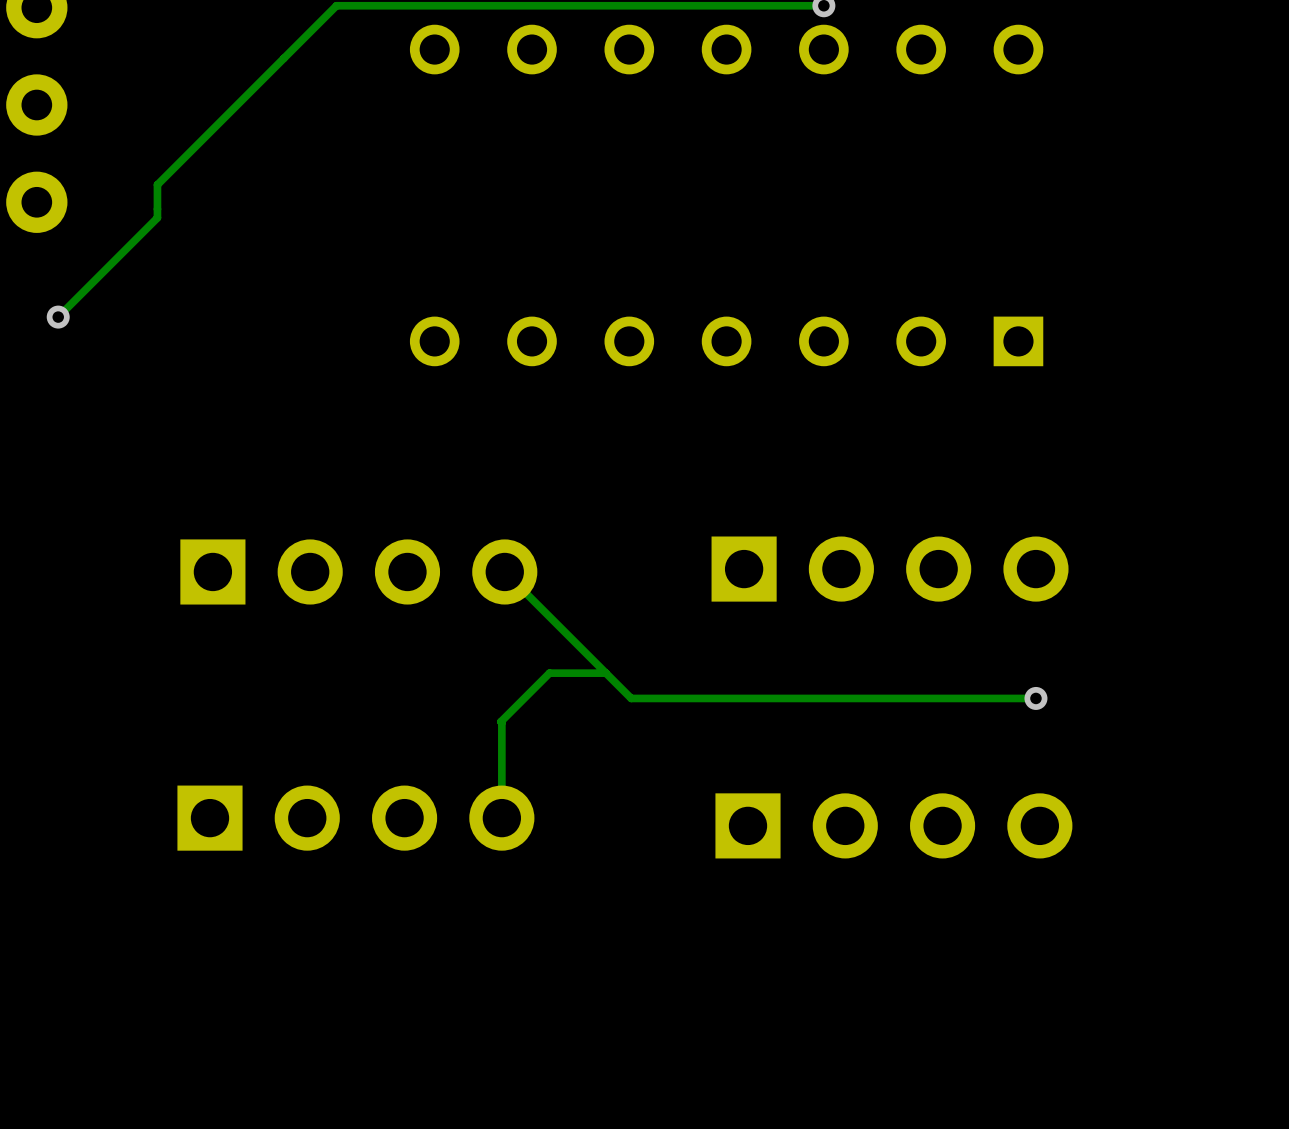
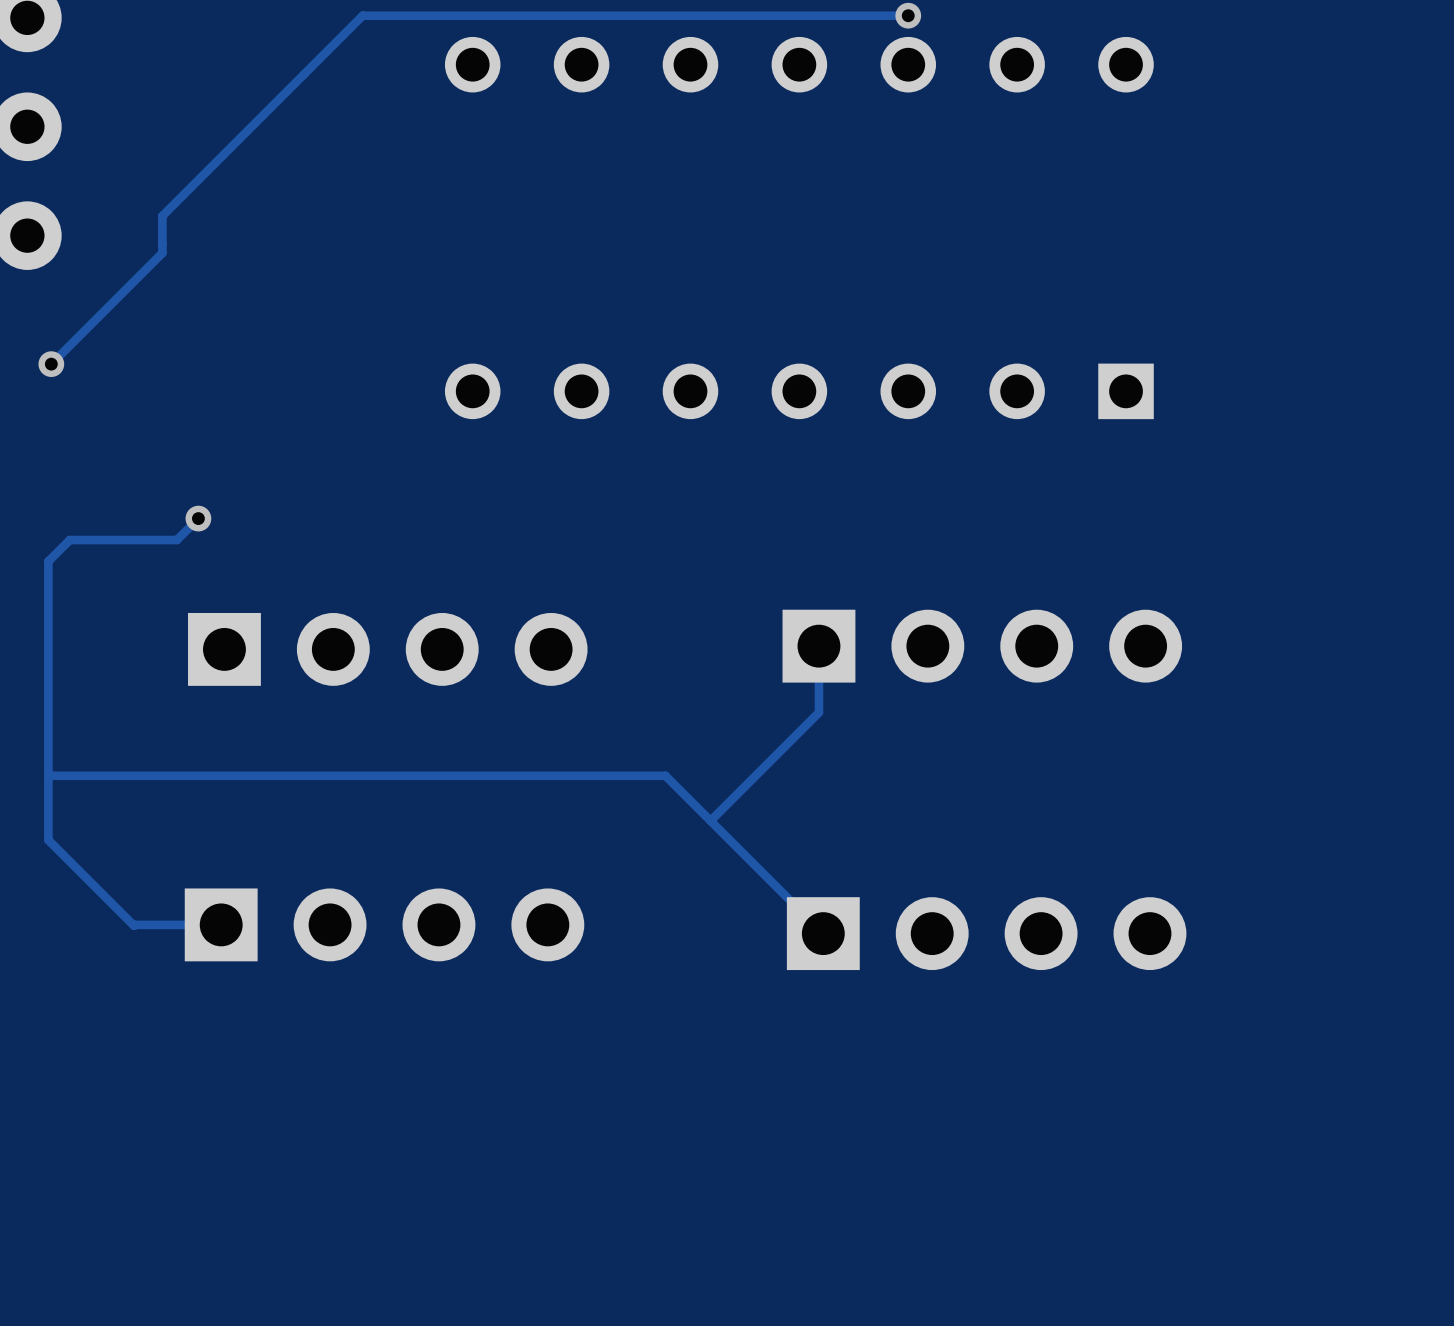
track: none -> (198, 518) (176, 540) (69, 540) (48, 561) (48, 840) (134, 925) (221, 924)
via: none -> (198, 518)
track: none -> (818, 646) (818, 712) (710, 820)
track: (504, 571) (631, 698) (1035, 698) -> none
track: (605, 673) (549, 673) (500, 721) (501, 818) -> none
track: none -> (48, 775) (665, 775) (823, 933)
via: (1035, 698) -> none

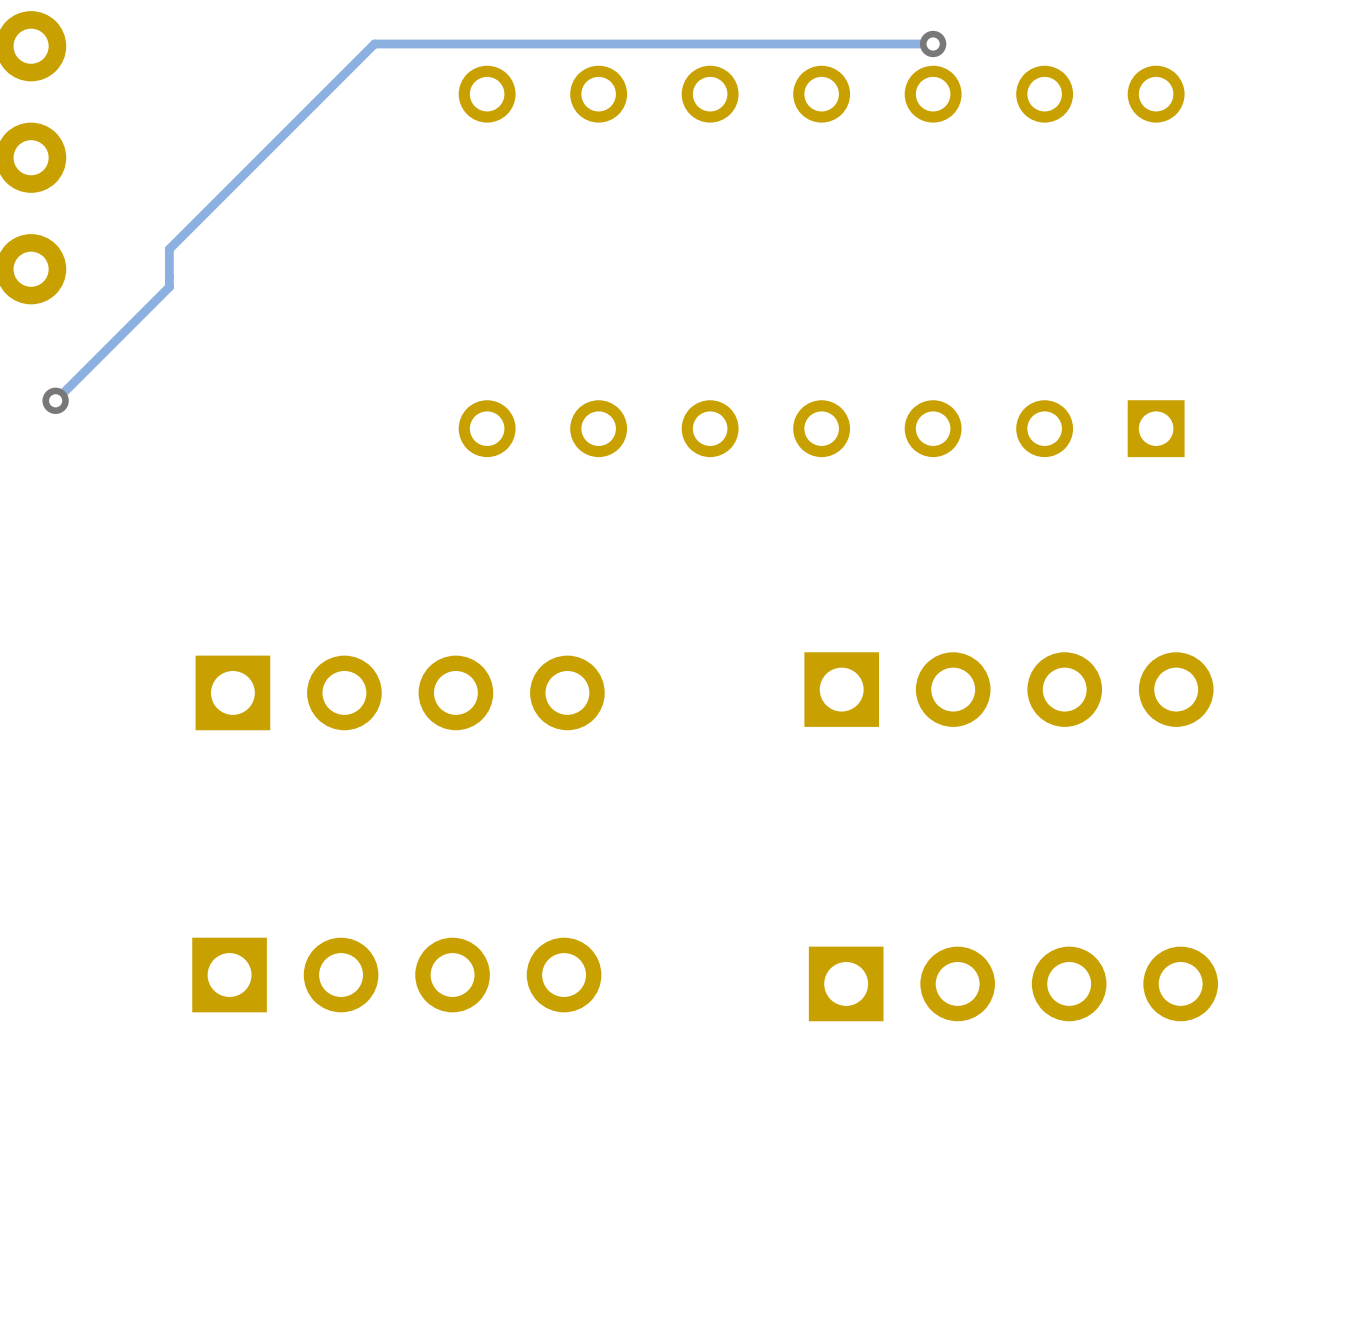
track: (198, 518) (176, 540) (69, 540) (48, 561) (48, 840) (134, 925) (221, 924) -> none
via: (198, 518) -> none
track: (818, 646) (818, 712) (710, 820) -> none
track: (48, 775) (665, 775) (823, 933) -> none

